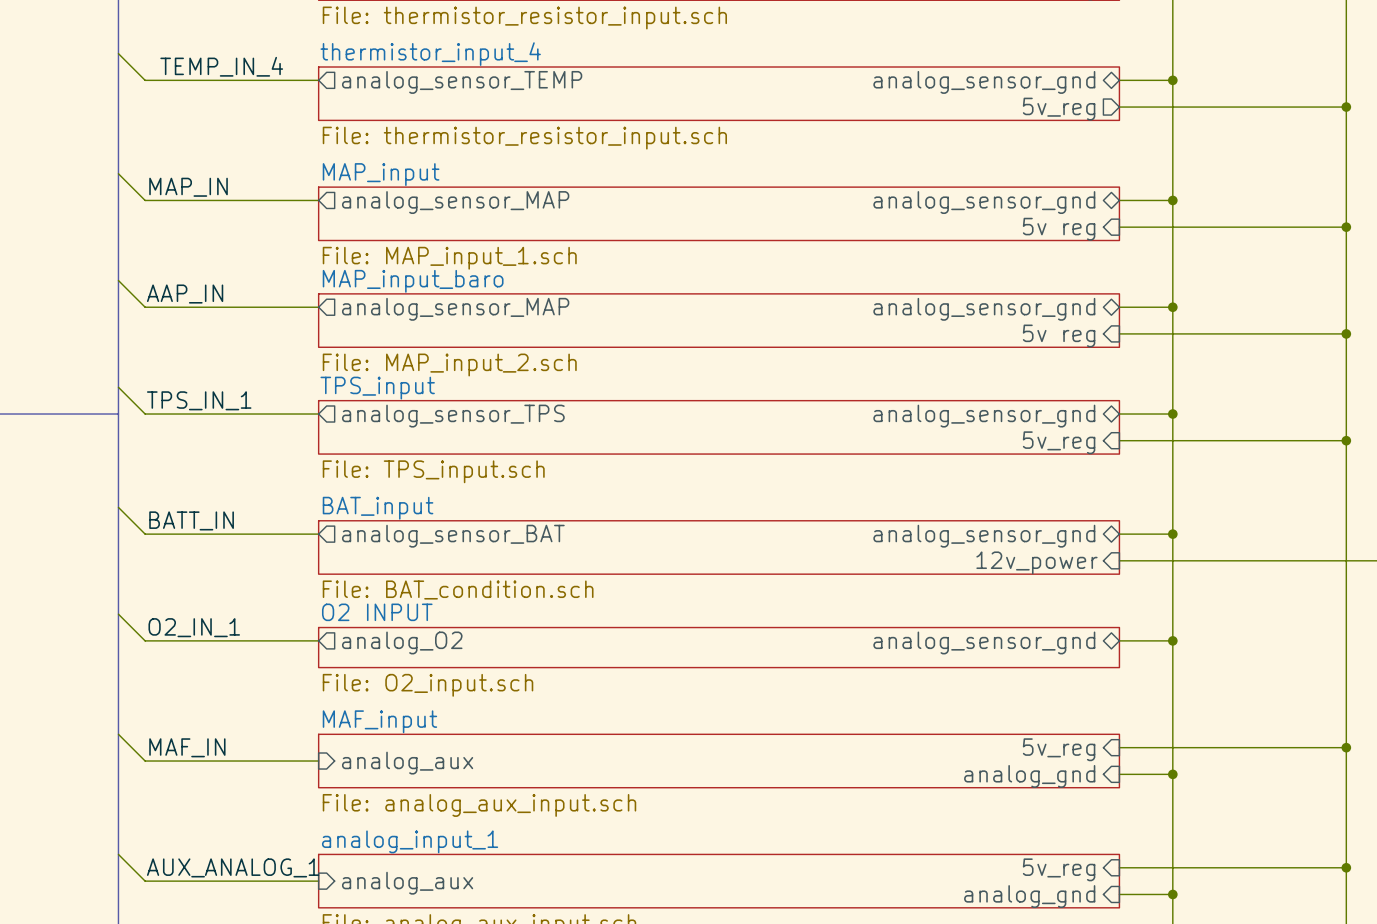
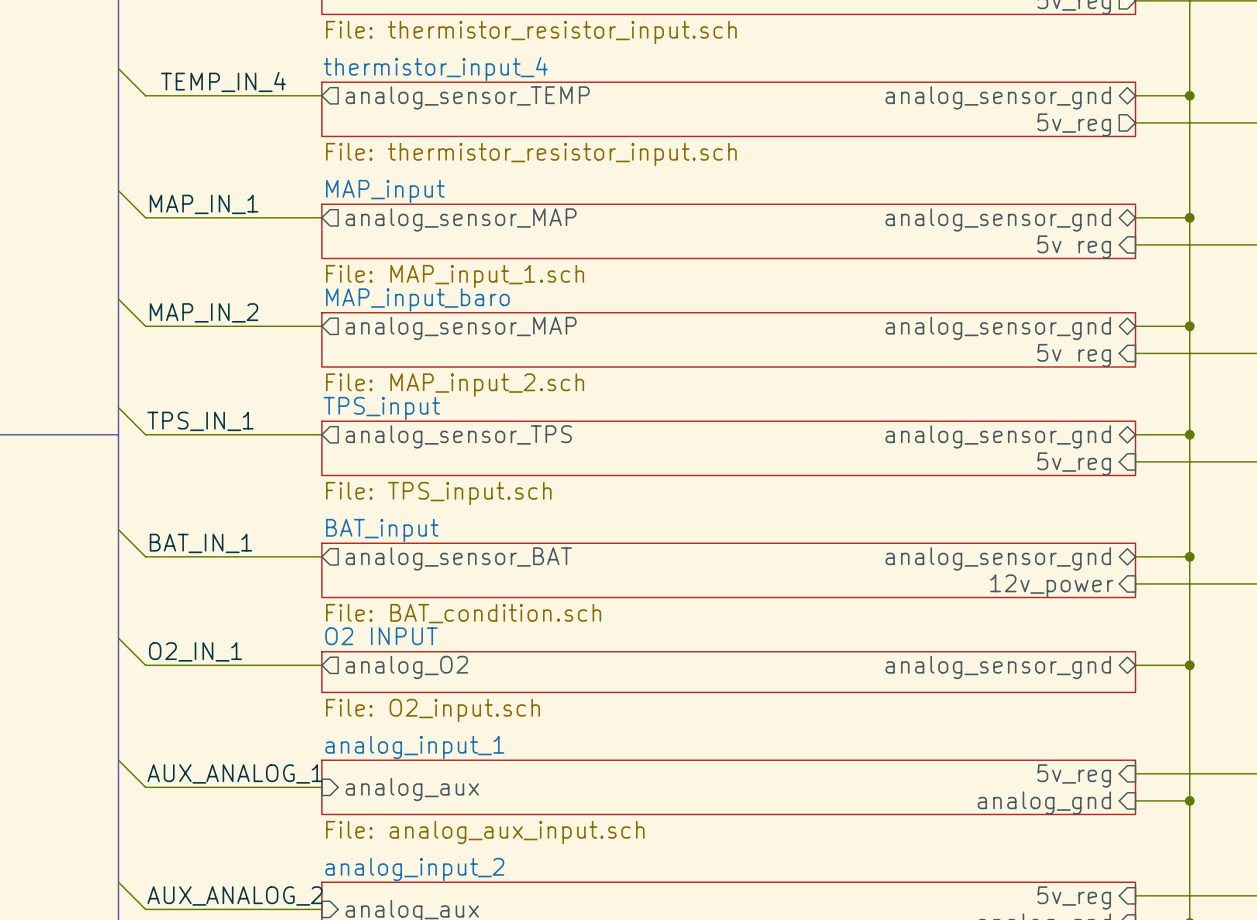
label: MAP_IN (188, 187) -> MAP_IN_1 (204, 204)
label: AAP_IN (185, 294) -> MAP_IN_2 (204, 312)
label: BATT_IN (191, 520) -> BAT_IN_1 (200, 543)
sheet MAF_input name: MAF_input (379, 721) -> analog_input_1 (414, 747)
label: MAF_IN (187, 747) -> AUX_ANALOG_1 (235, 773)
sheet analog_input_1 name: analog_input_1 (410, 841) -> analog_input_2 (414, 869)
label: AUX_ANALOG_1 (233, 867) -> AUX_ANALOG_2 (235, 895)

